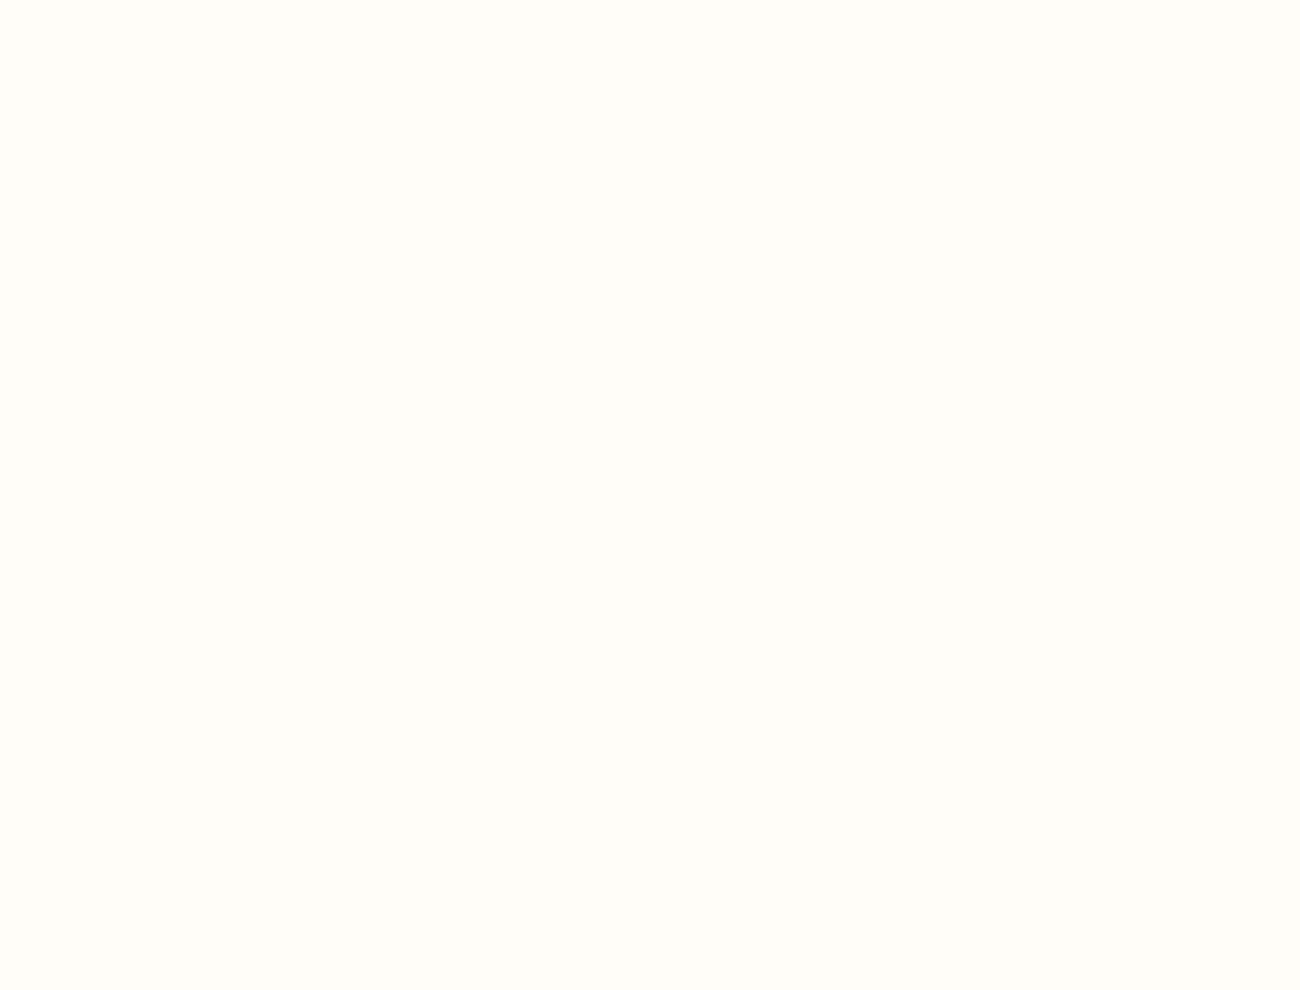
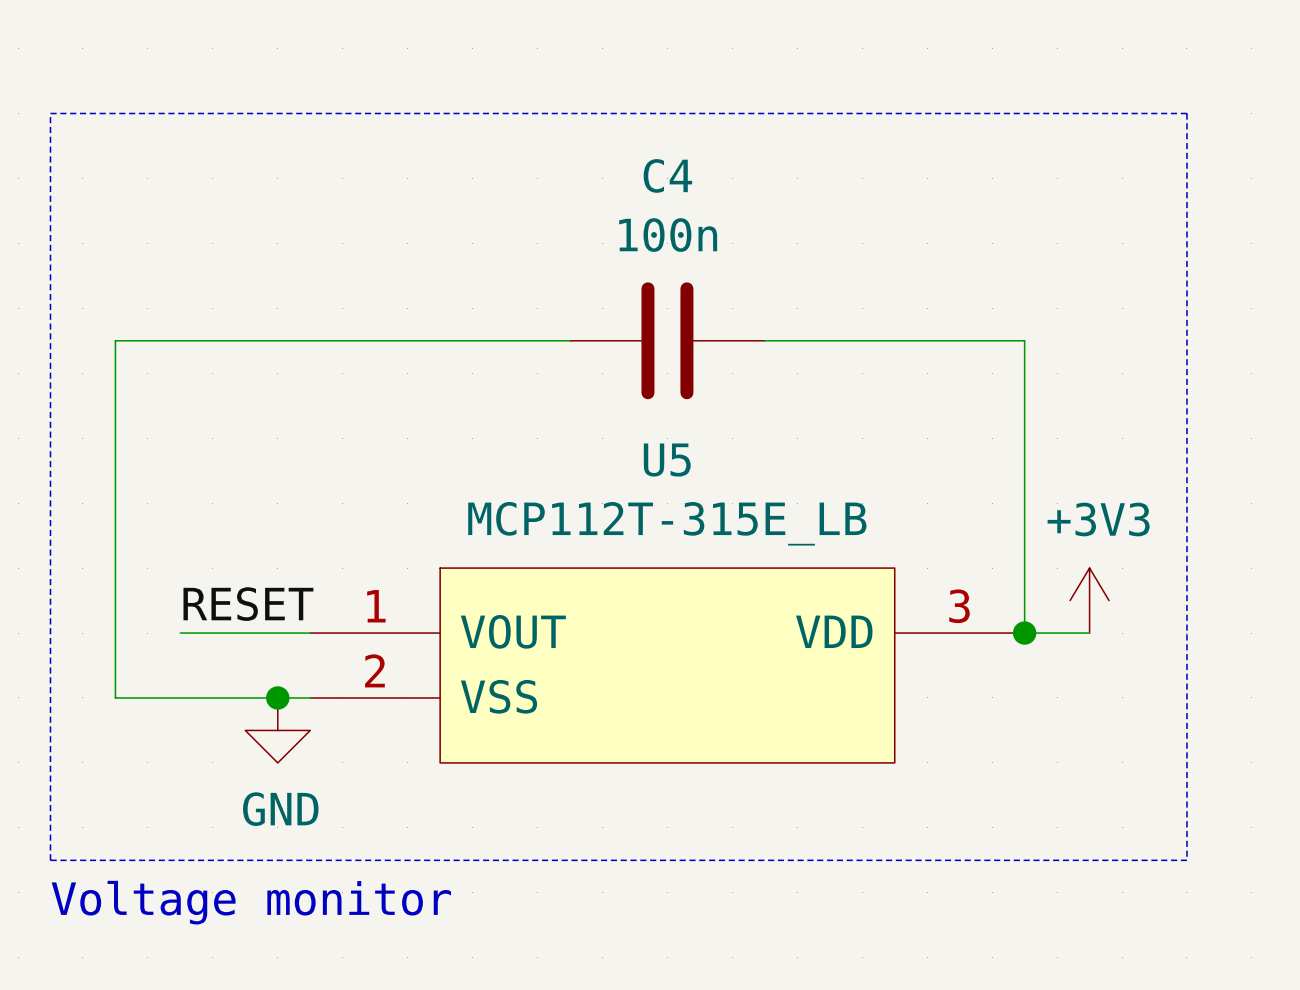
line: none -> (50, 113) (50, 860) (1186, 860) (1186, 113) (50, 113)
wire: none -> (570, 340) (115, 340) (115, 697) (310, 697)
C4: none -> 100n (667, 340)
wire: none -> (764, 340) (1024, 340) (1024, 633) (1089, 633)
power symbol: none -> +3V3 (1089, 600)
label: none -> RESET (248, 604)
wire: none -> (180, 633) (310, 633)
junction: none -> (1024, 633)
U5: none -> MCP112T-315E_LB (667, 665)
junction: none -> (277, 697)
power symbol: none -> GND (277, 730)
text: none -> Voltage monitor (251, 902)

